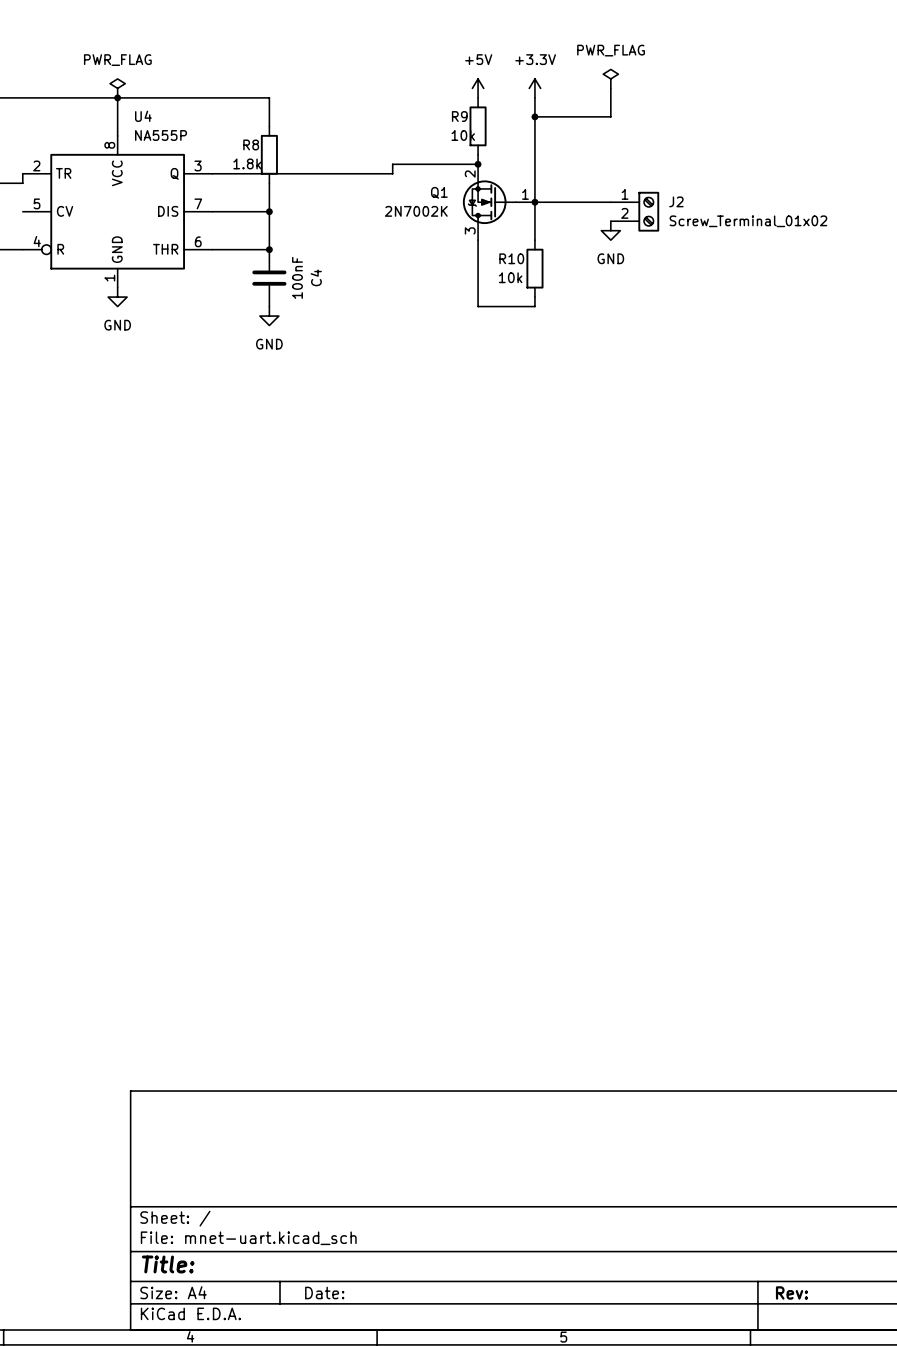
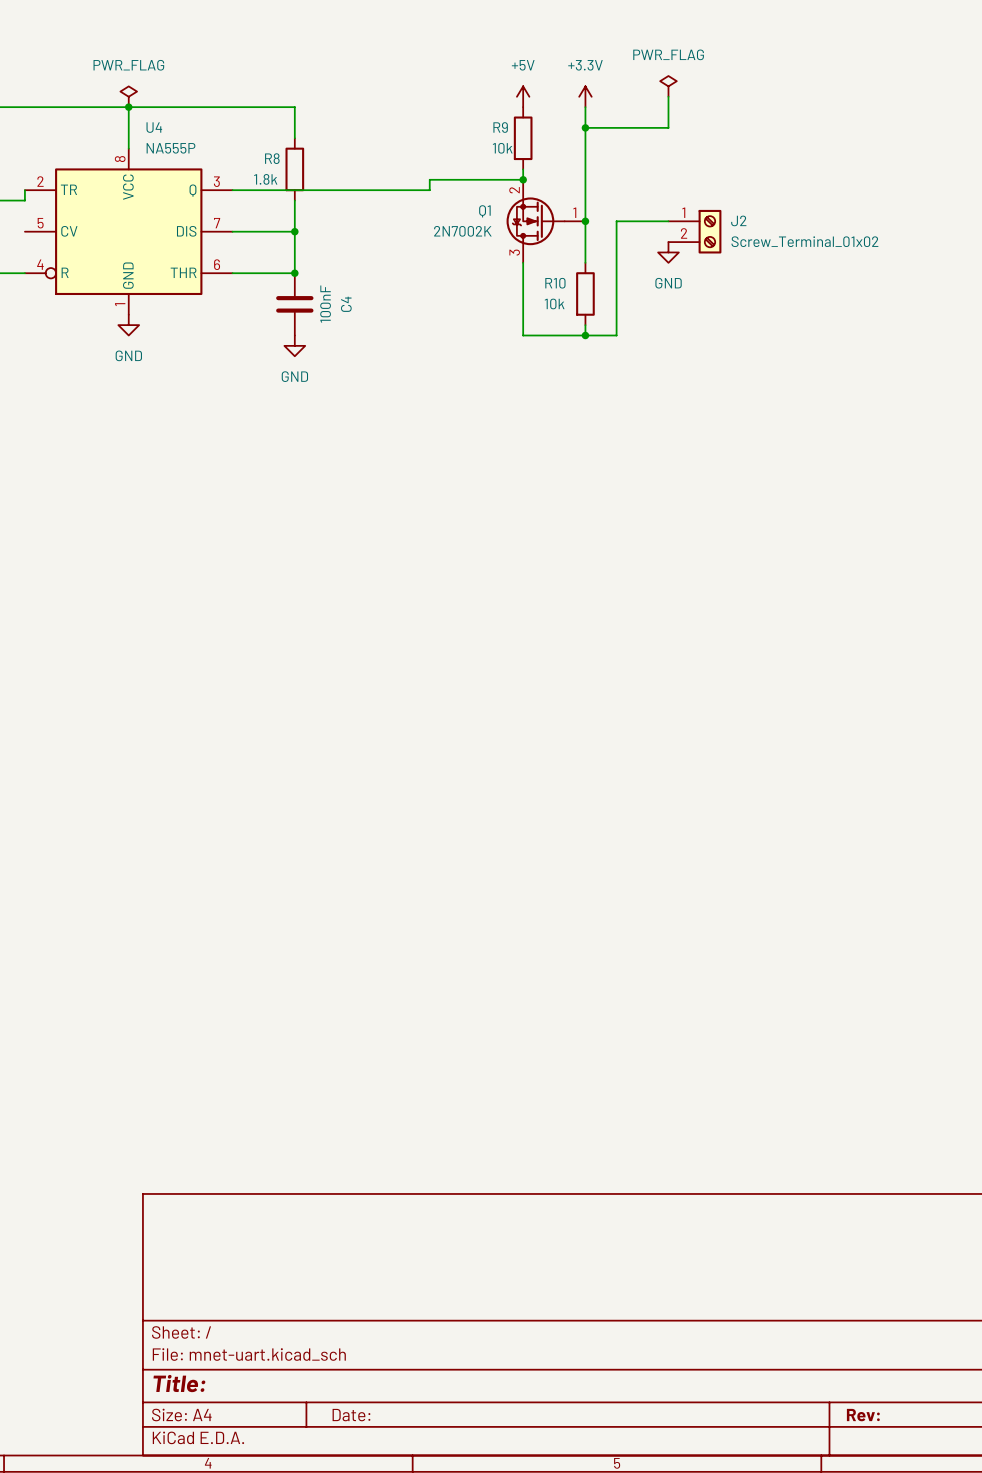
wire: (534, 202) (563, 202) -> (585, 335) (616, 335) (616, 221)
junction: none -> (585, 335)

